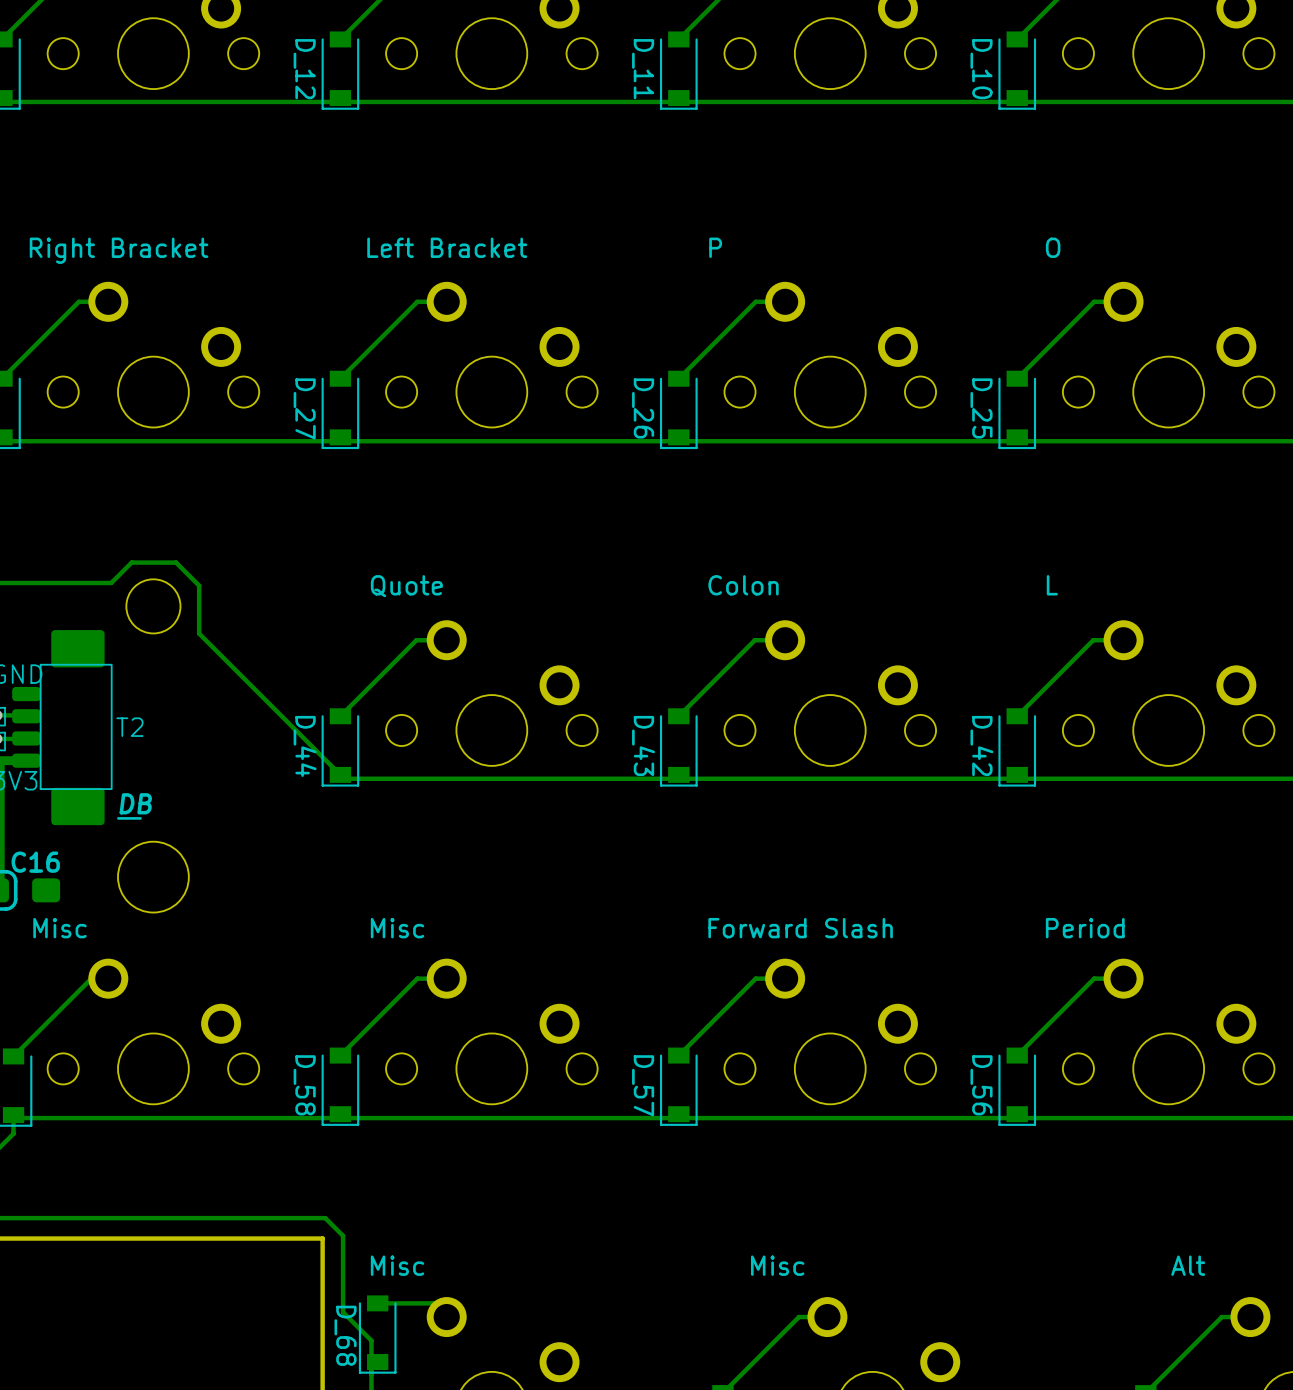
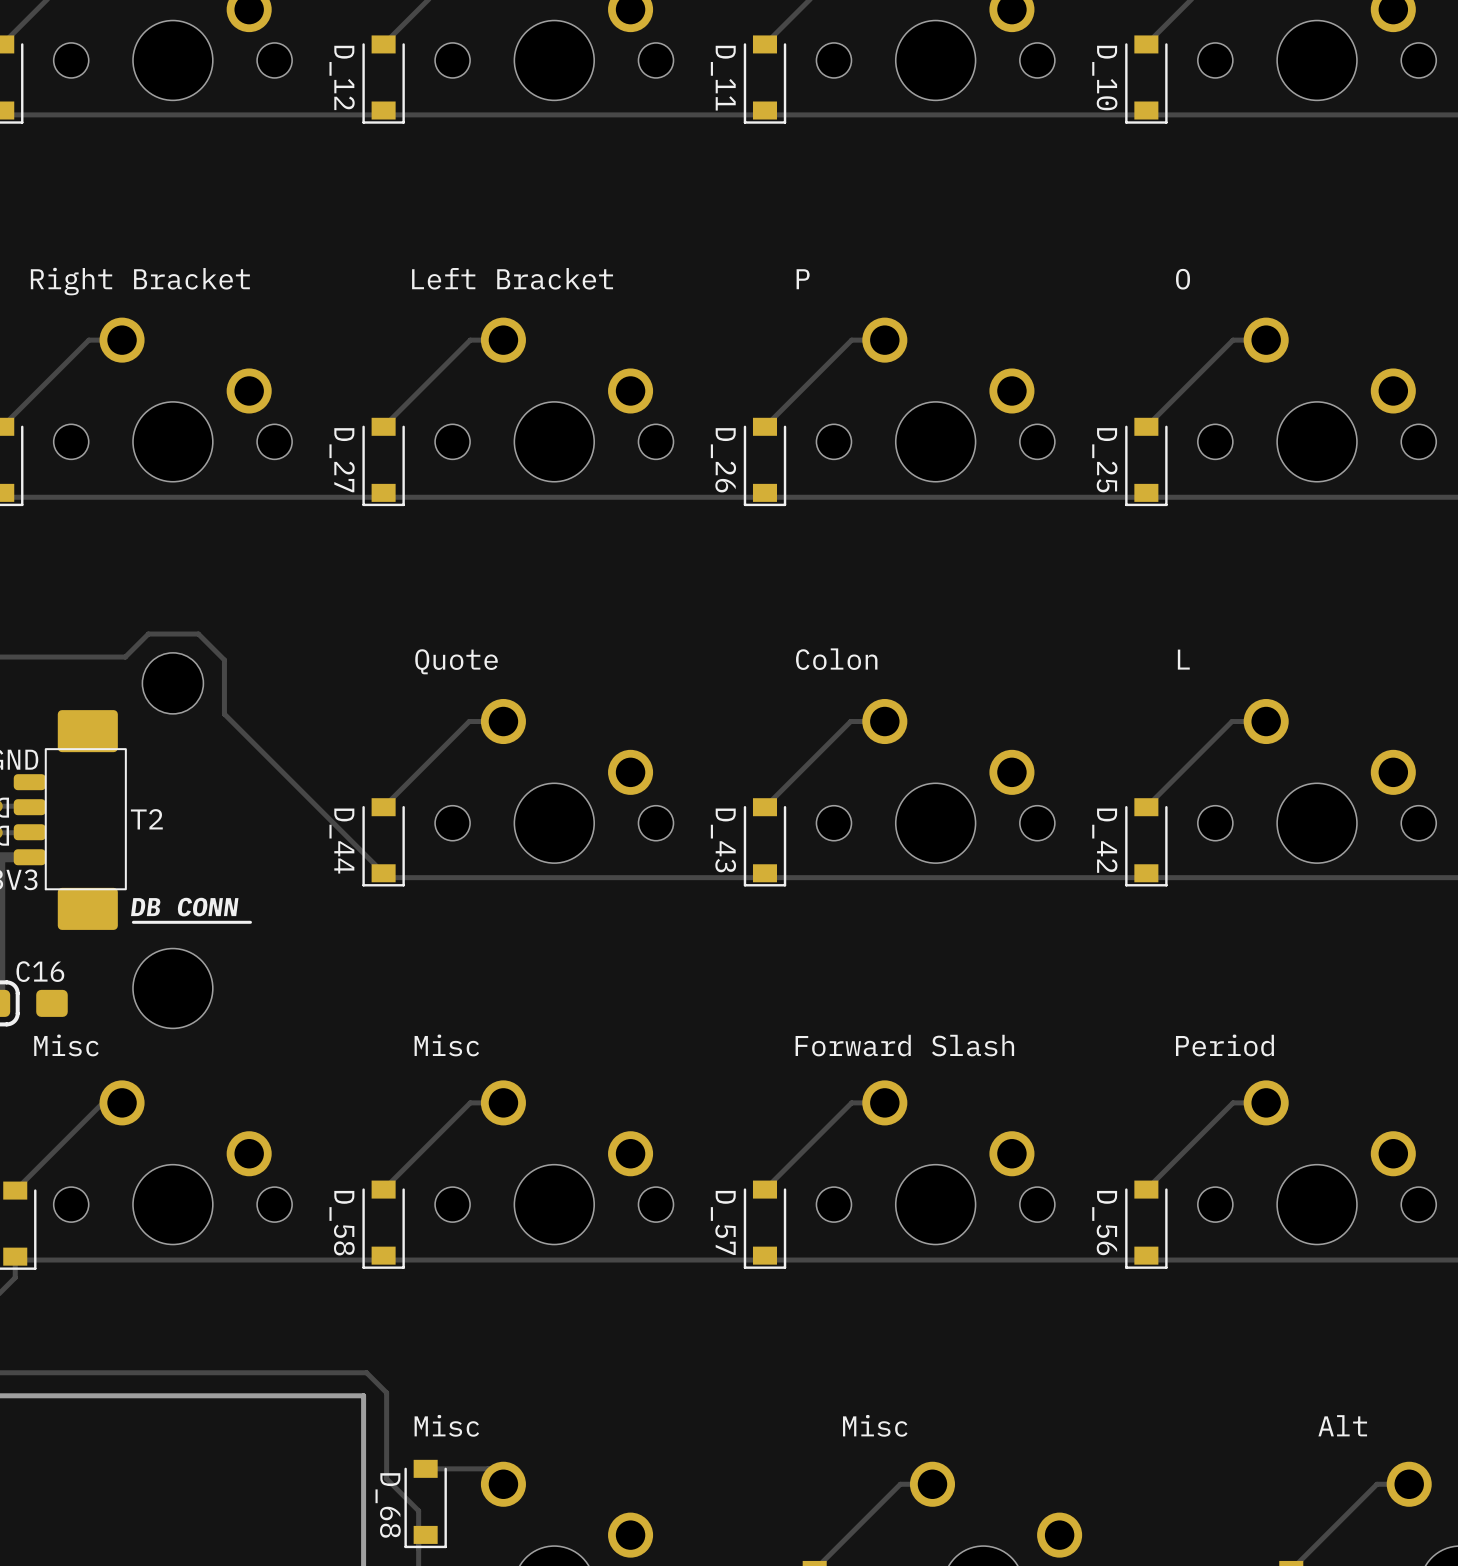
text: DB (135, 803) -> DB CONN (184, 907)
line: none -> (250, 922) (158, 922)

